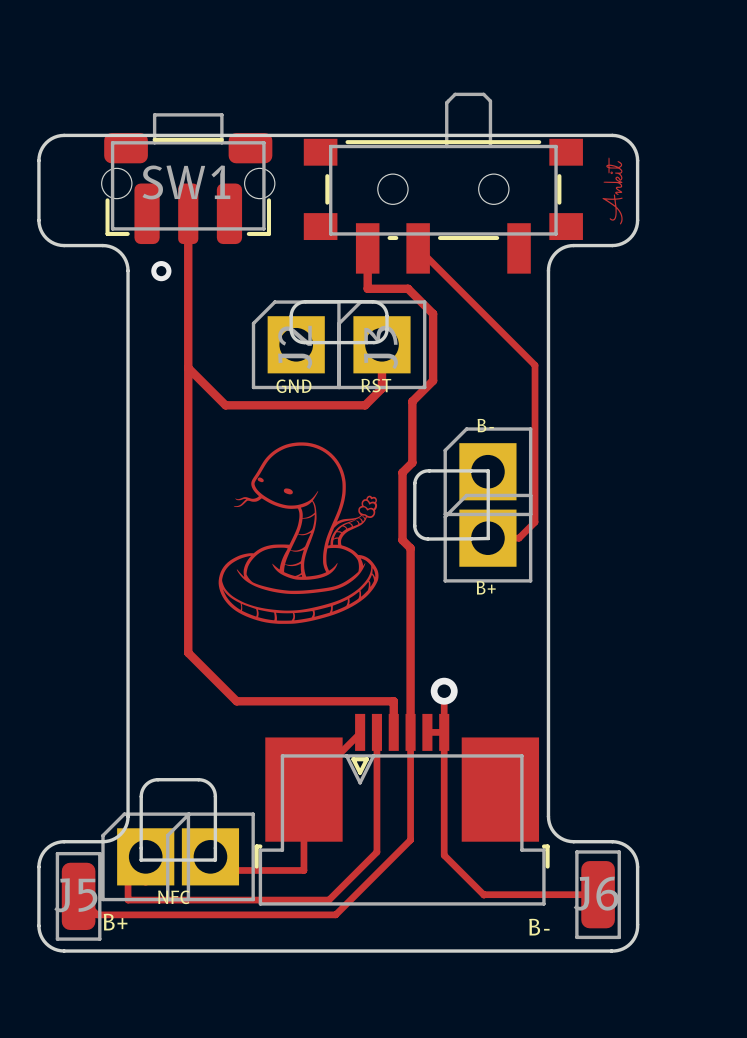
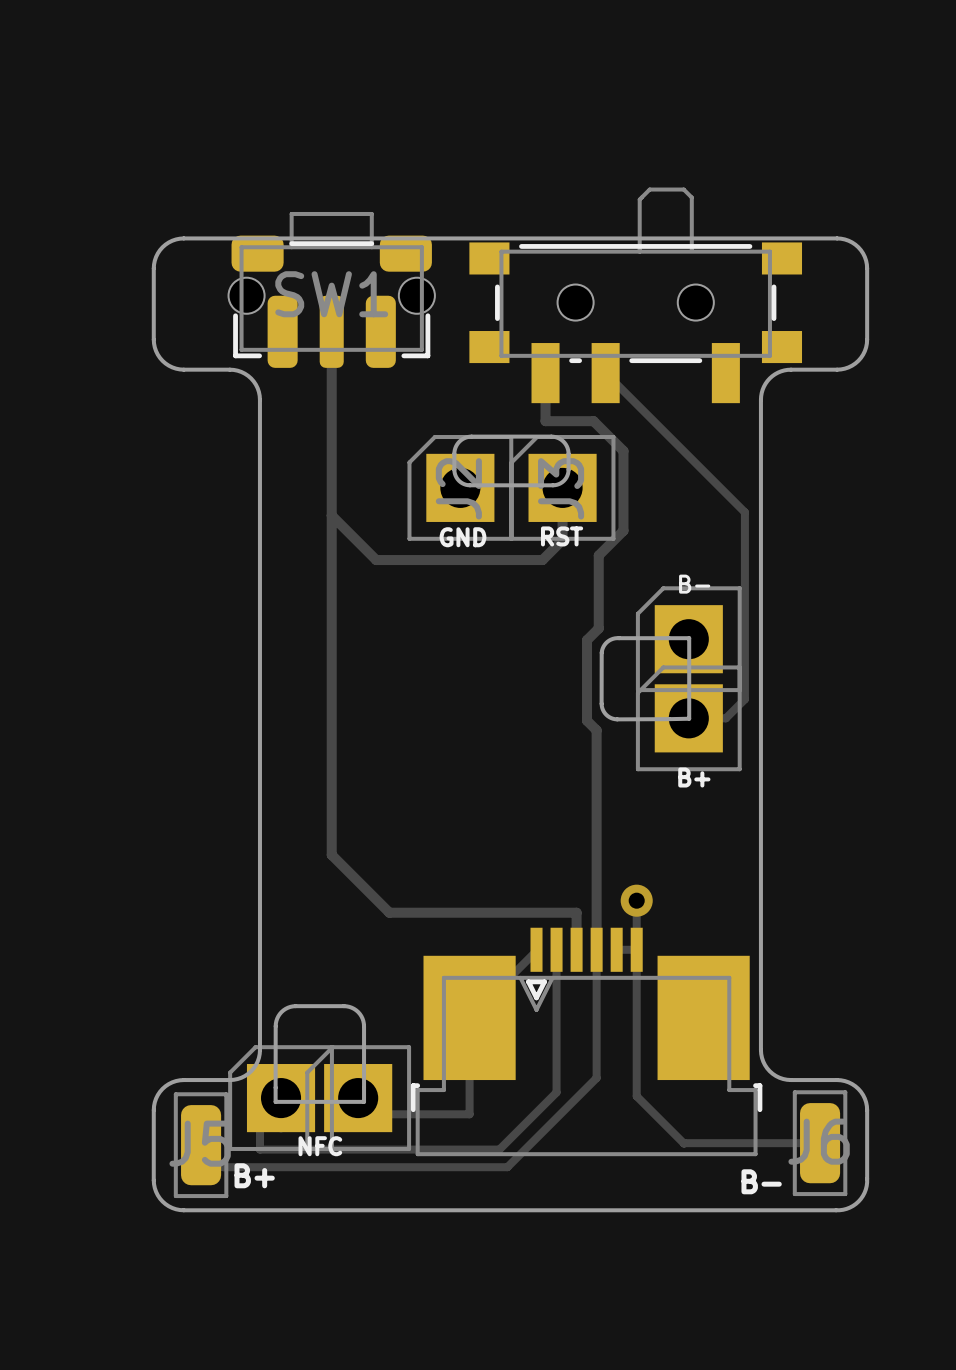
drawing: [602, 157, 623, 225] -> none
via: (161, 271) -> none
drawing: [218, 442, 379, 624] -> none

